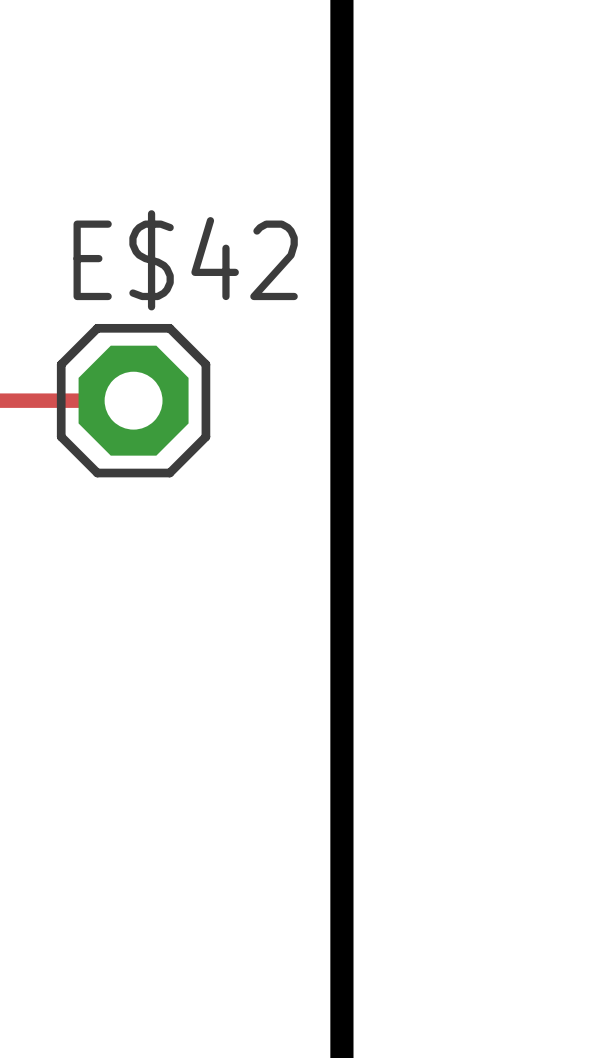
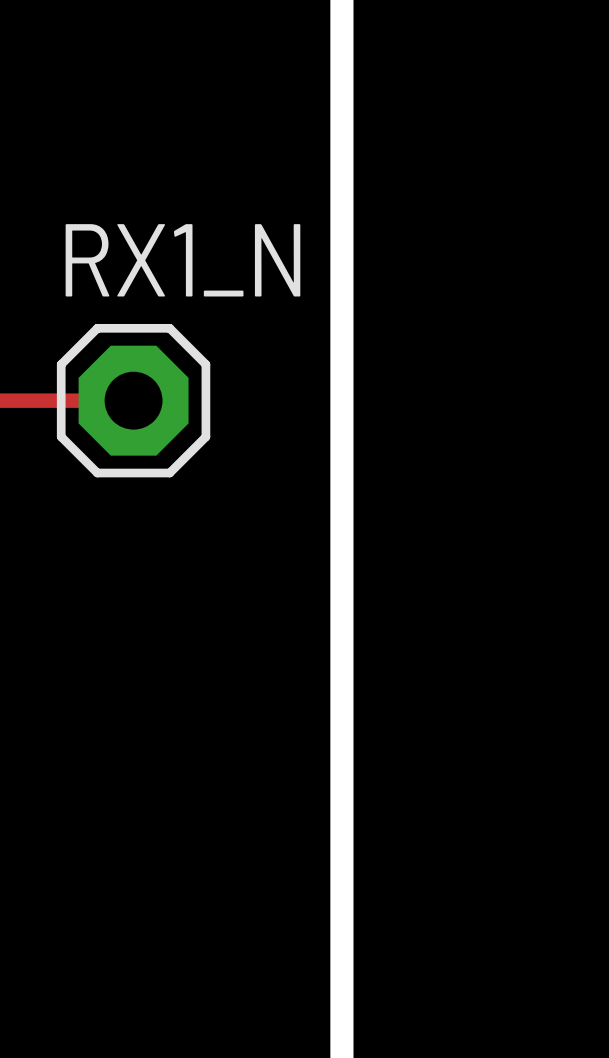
E$42 name: E$42 (185, 260) -> RX1_N (182, 260)

